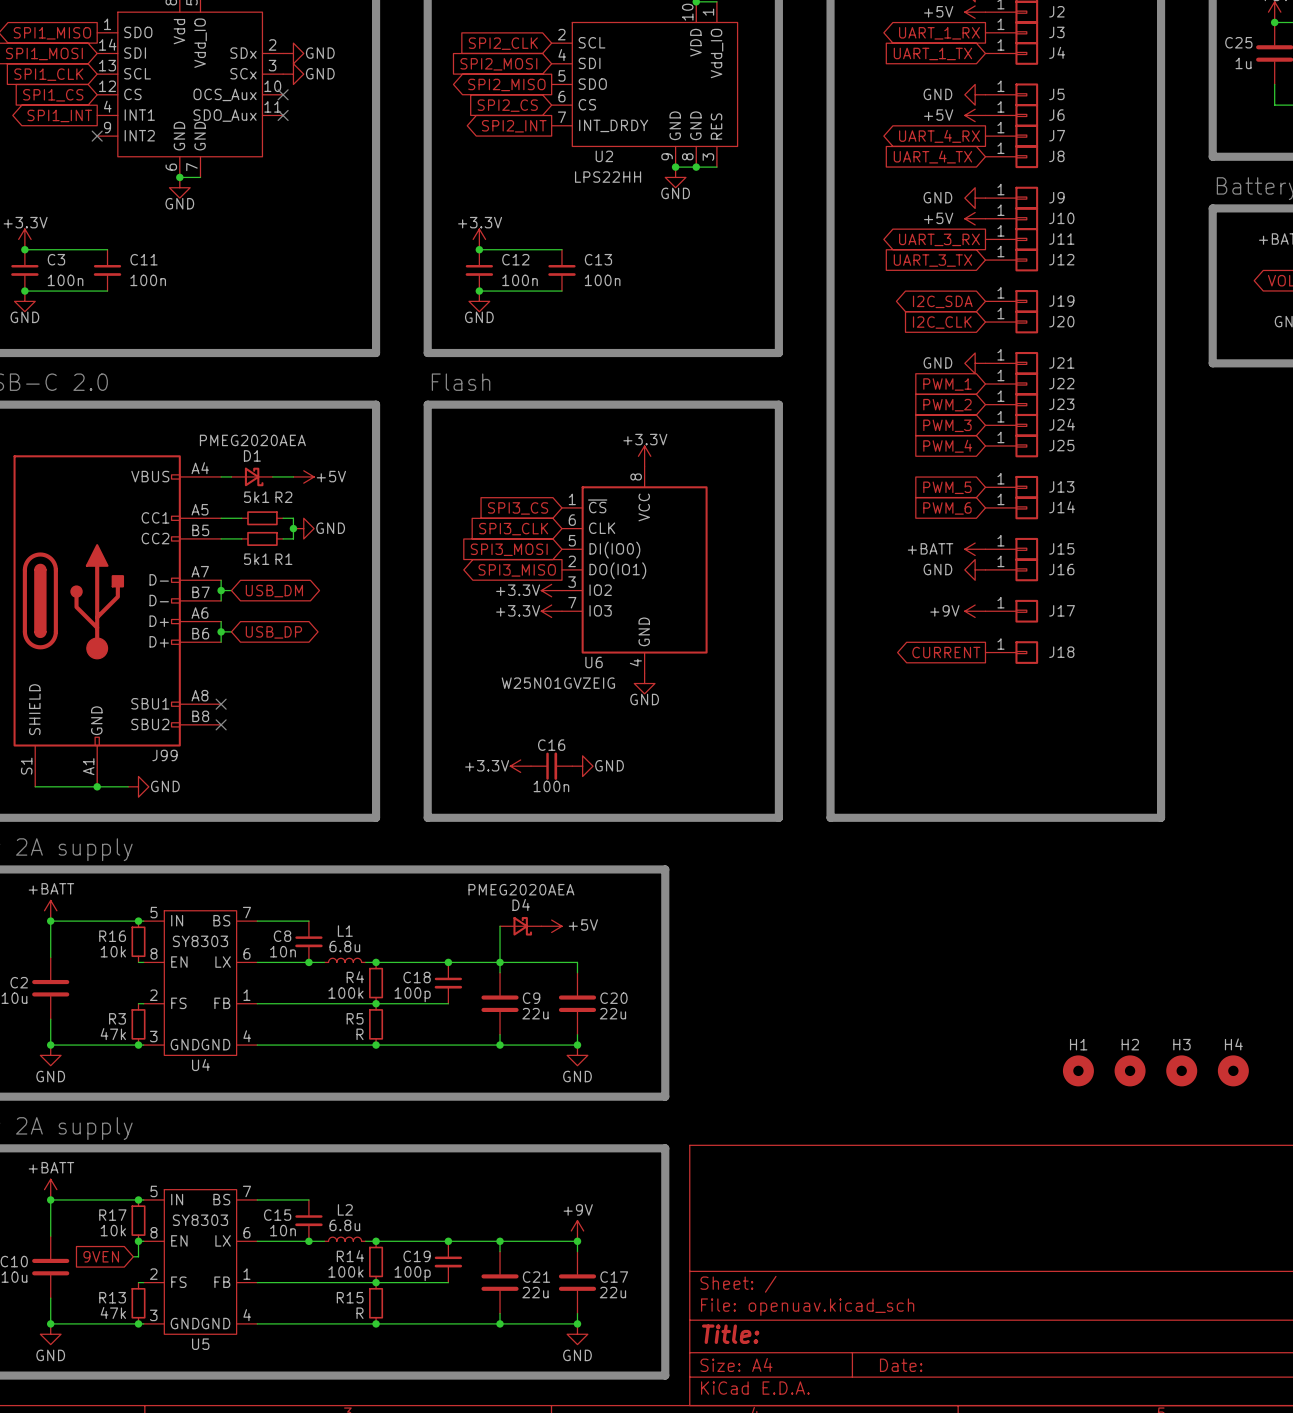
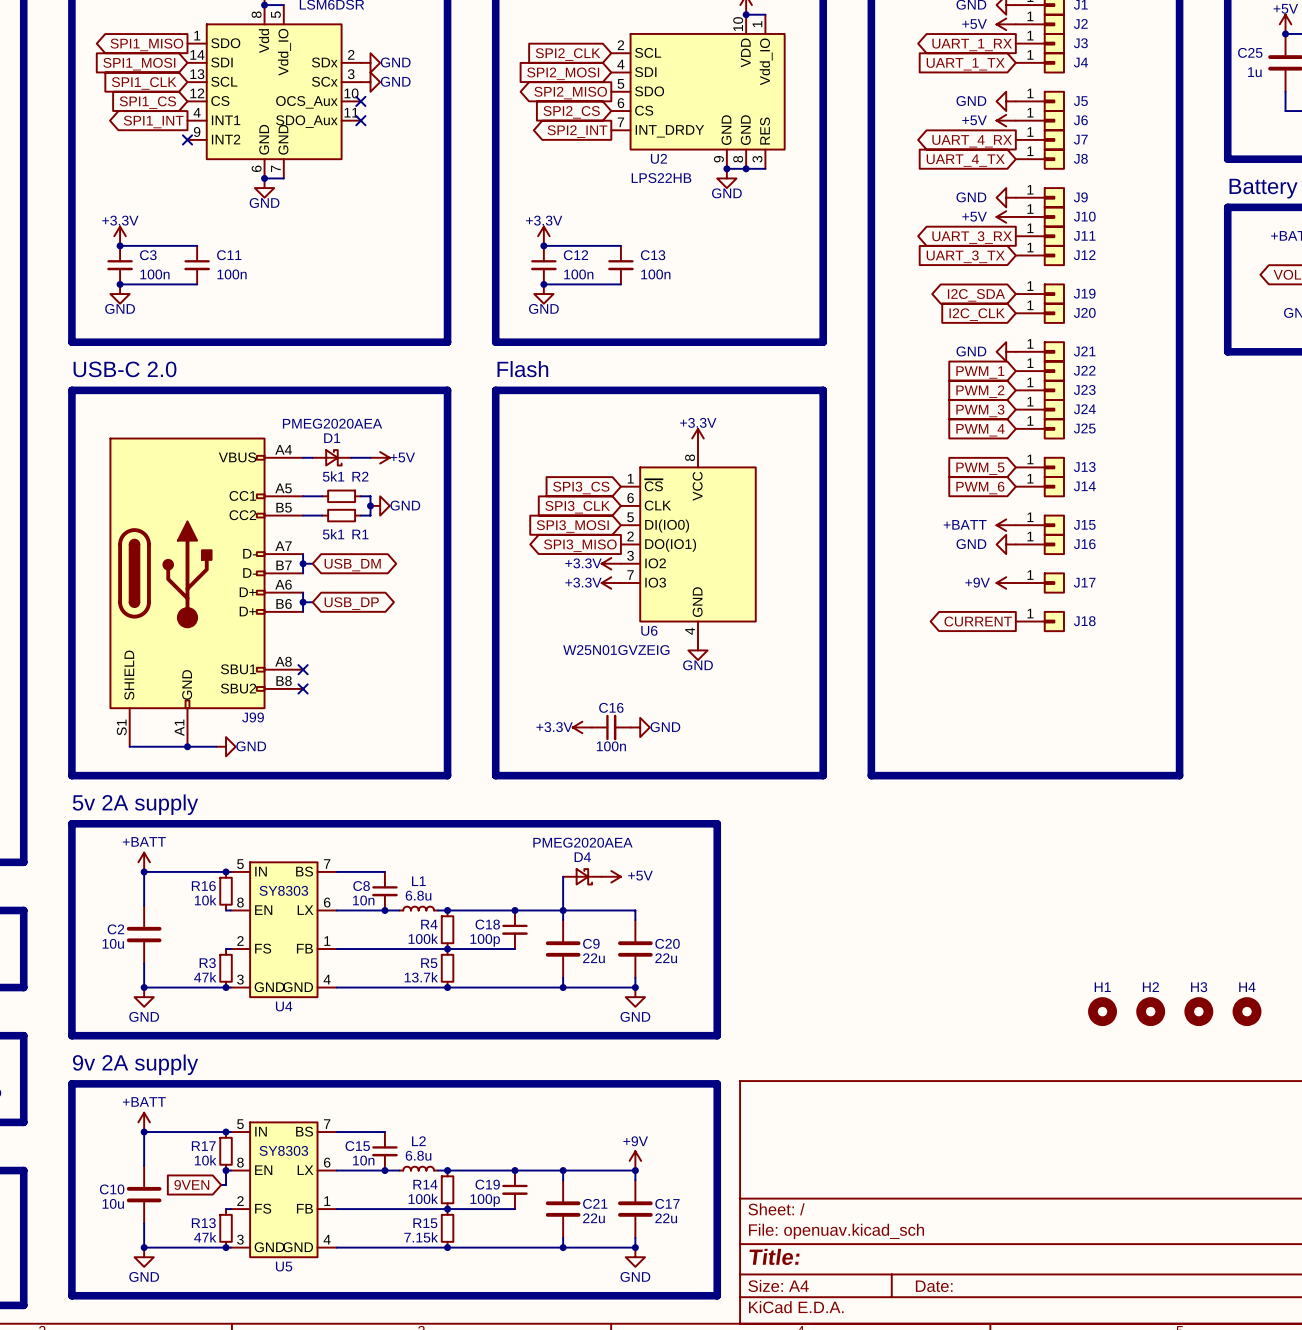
U2 value: LPS22HH (608, 177) -> LPS22HB (661, 178)
R5 value: R (360, 1034) -> 13.7k (421, 977)
R15 value: R (360, 1313) -> 7.15k (421, 1237)

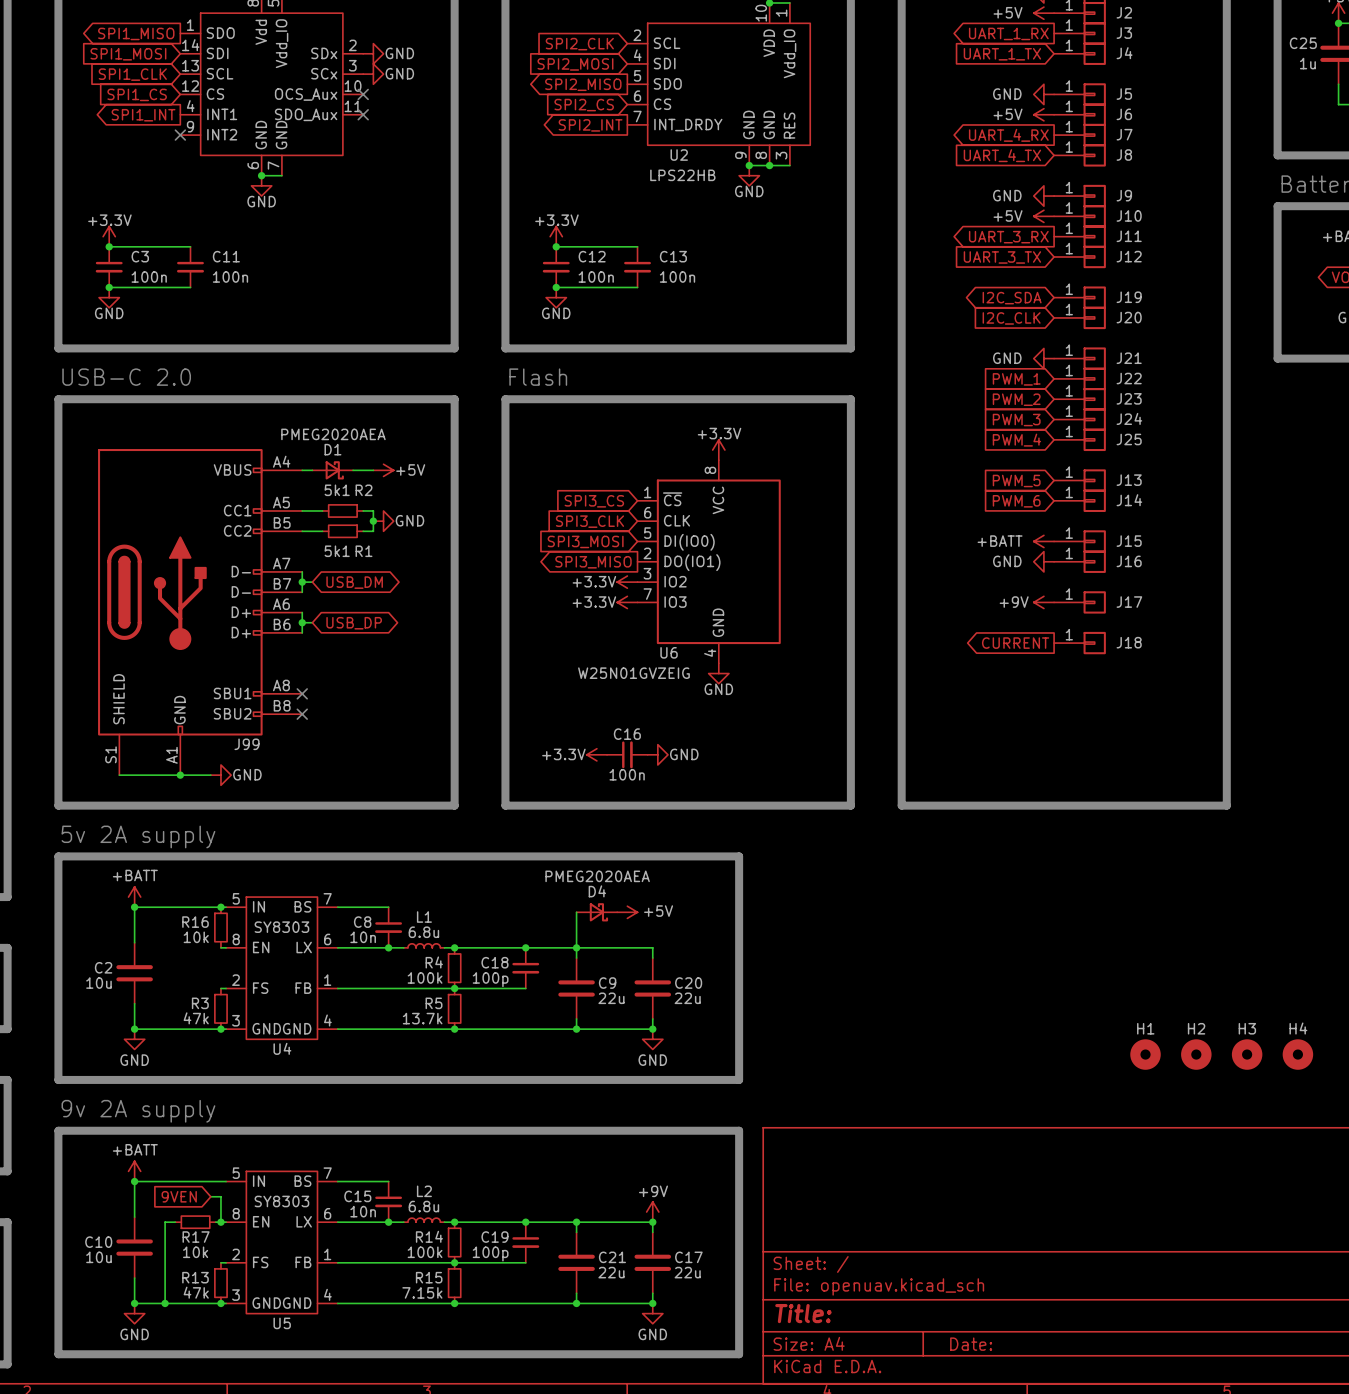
junction: (226, 1132) -> none
R17 name position: R17 (203, 1146) -> R17 (196, 1237)
wire: none -> (210, 1196) (220, 1196) (220, 1222) (215, 1222)
R17 rotation: 0° (226, 1151) -> 90° clockwise (195, 1222)
R17 position: (226, 1151) -> (195, 1222)
R17 value position: 10k (205, 1160) -> 10k (195, 1252)
wire: none -> (175, 1222) (165, 1222) (165, 1303)
wire: (226, 1170) (226, 1184) (221, 1184) -> none
global label position: 9VEN (191, 1184) -> 9VEN (179, 1196)
junction: none -> (165, 1303)

